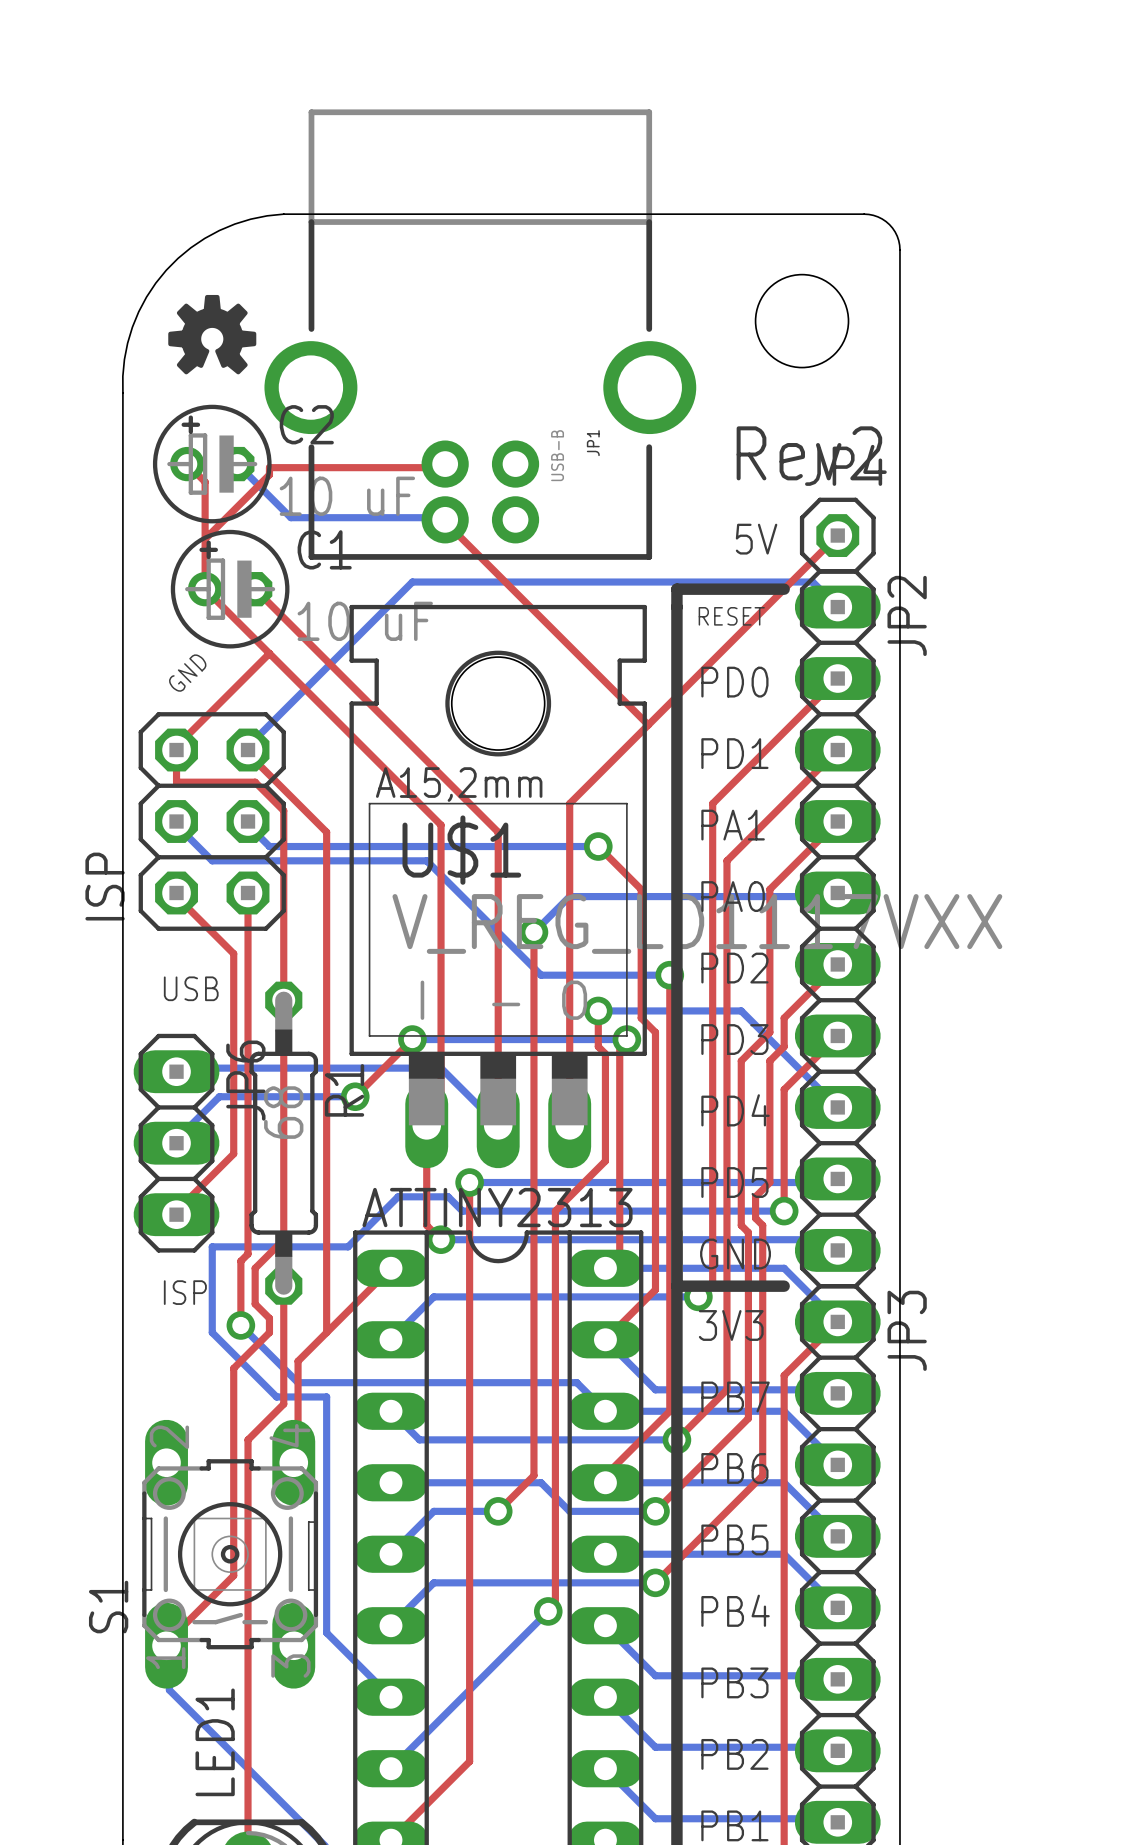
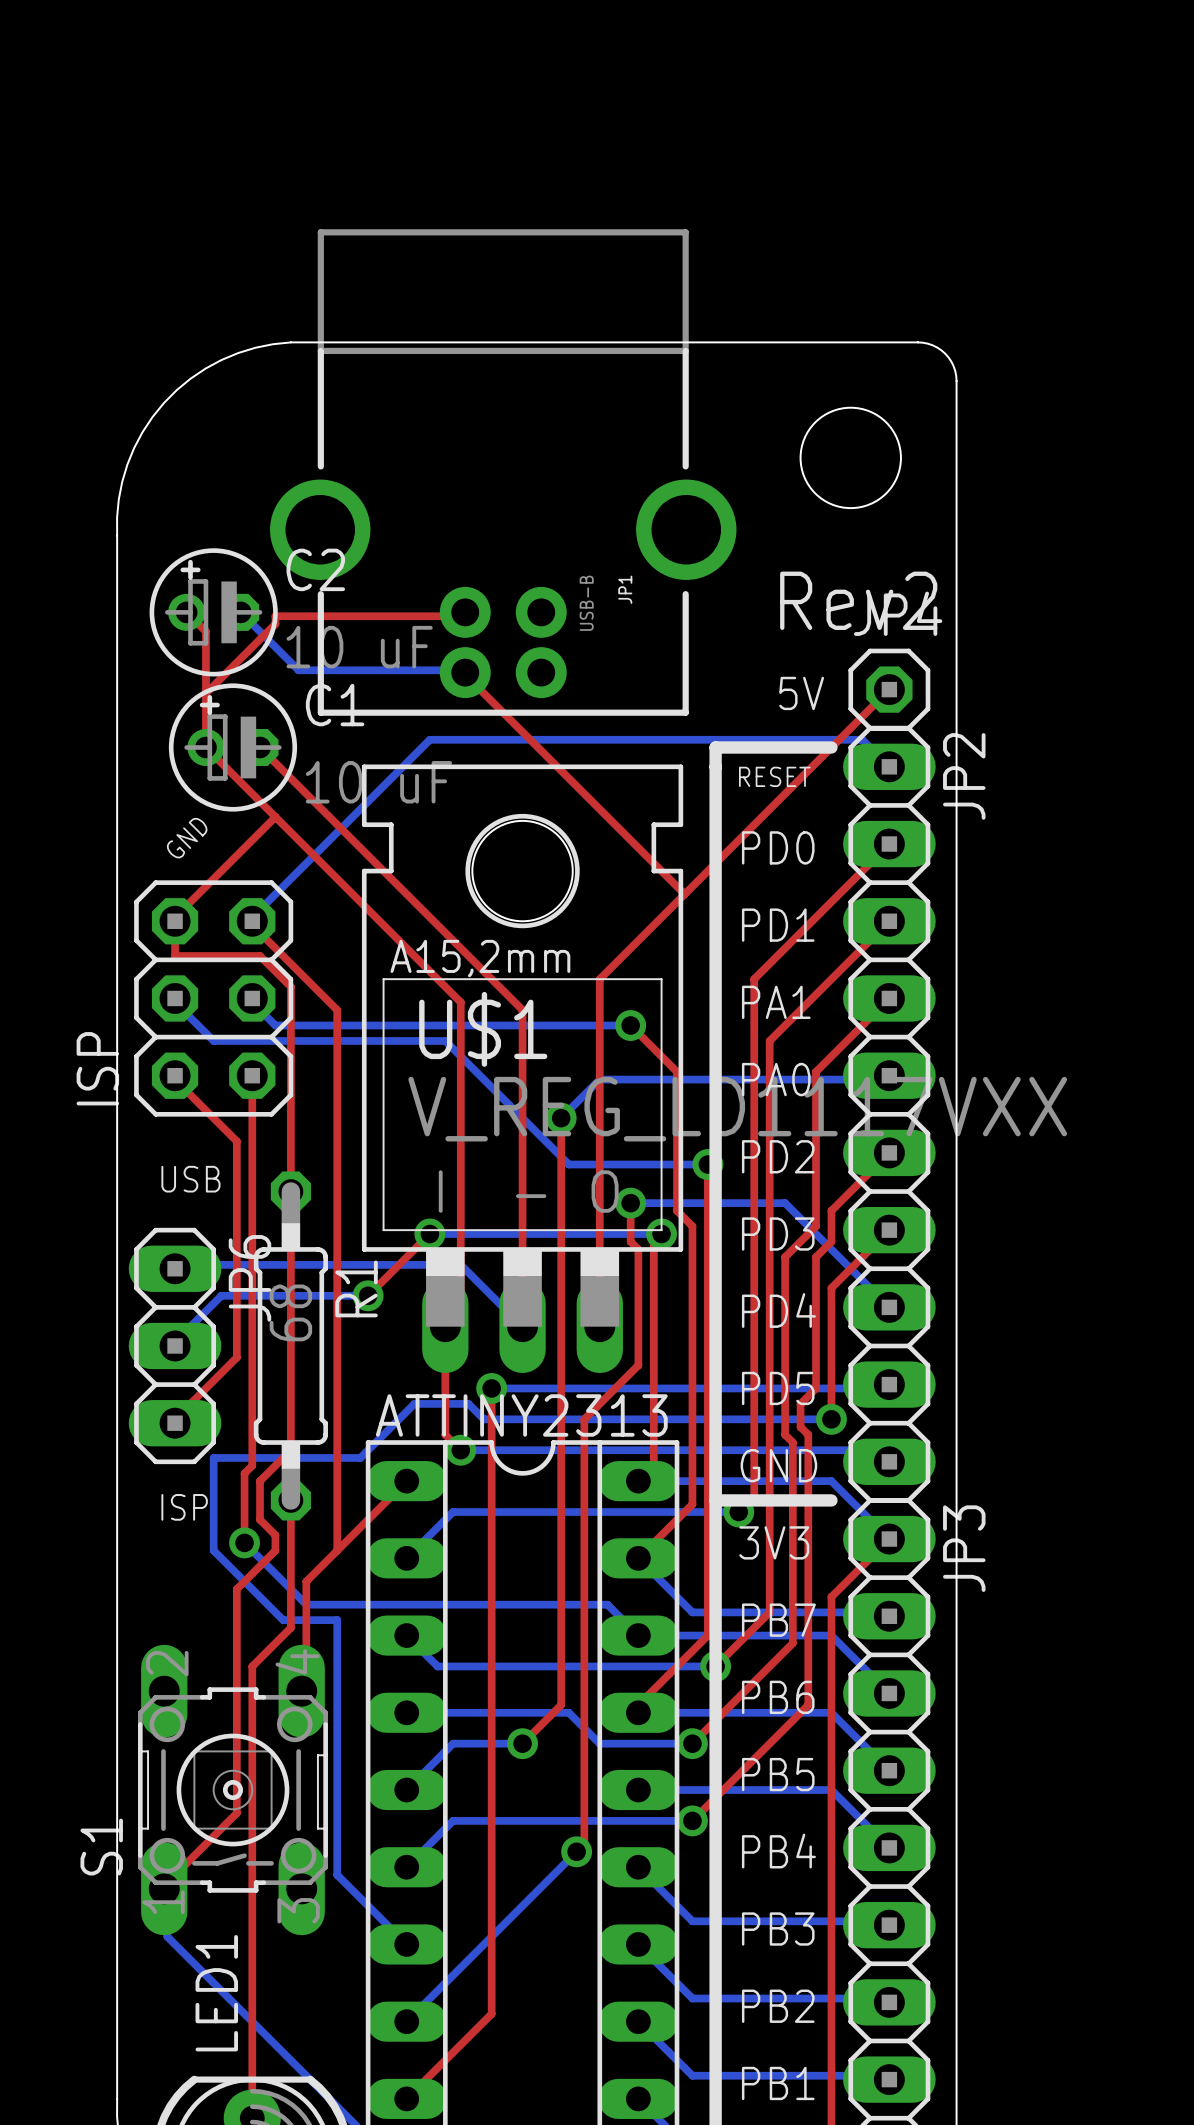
drawing: [168, 294, 257, 375] -> none

